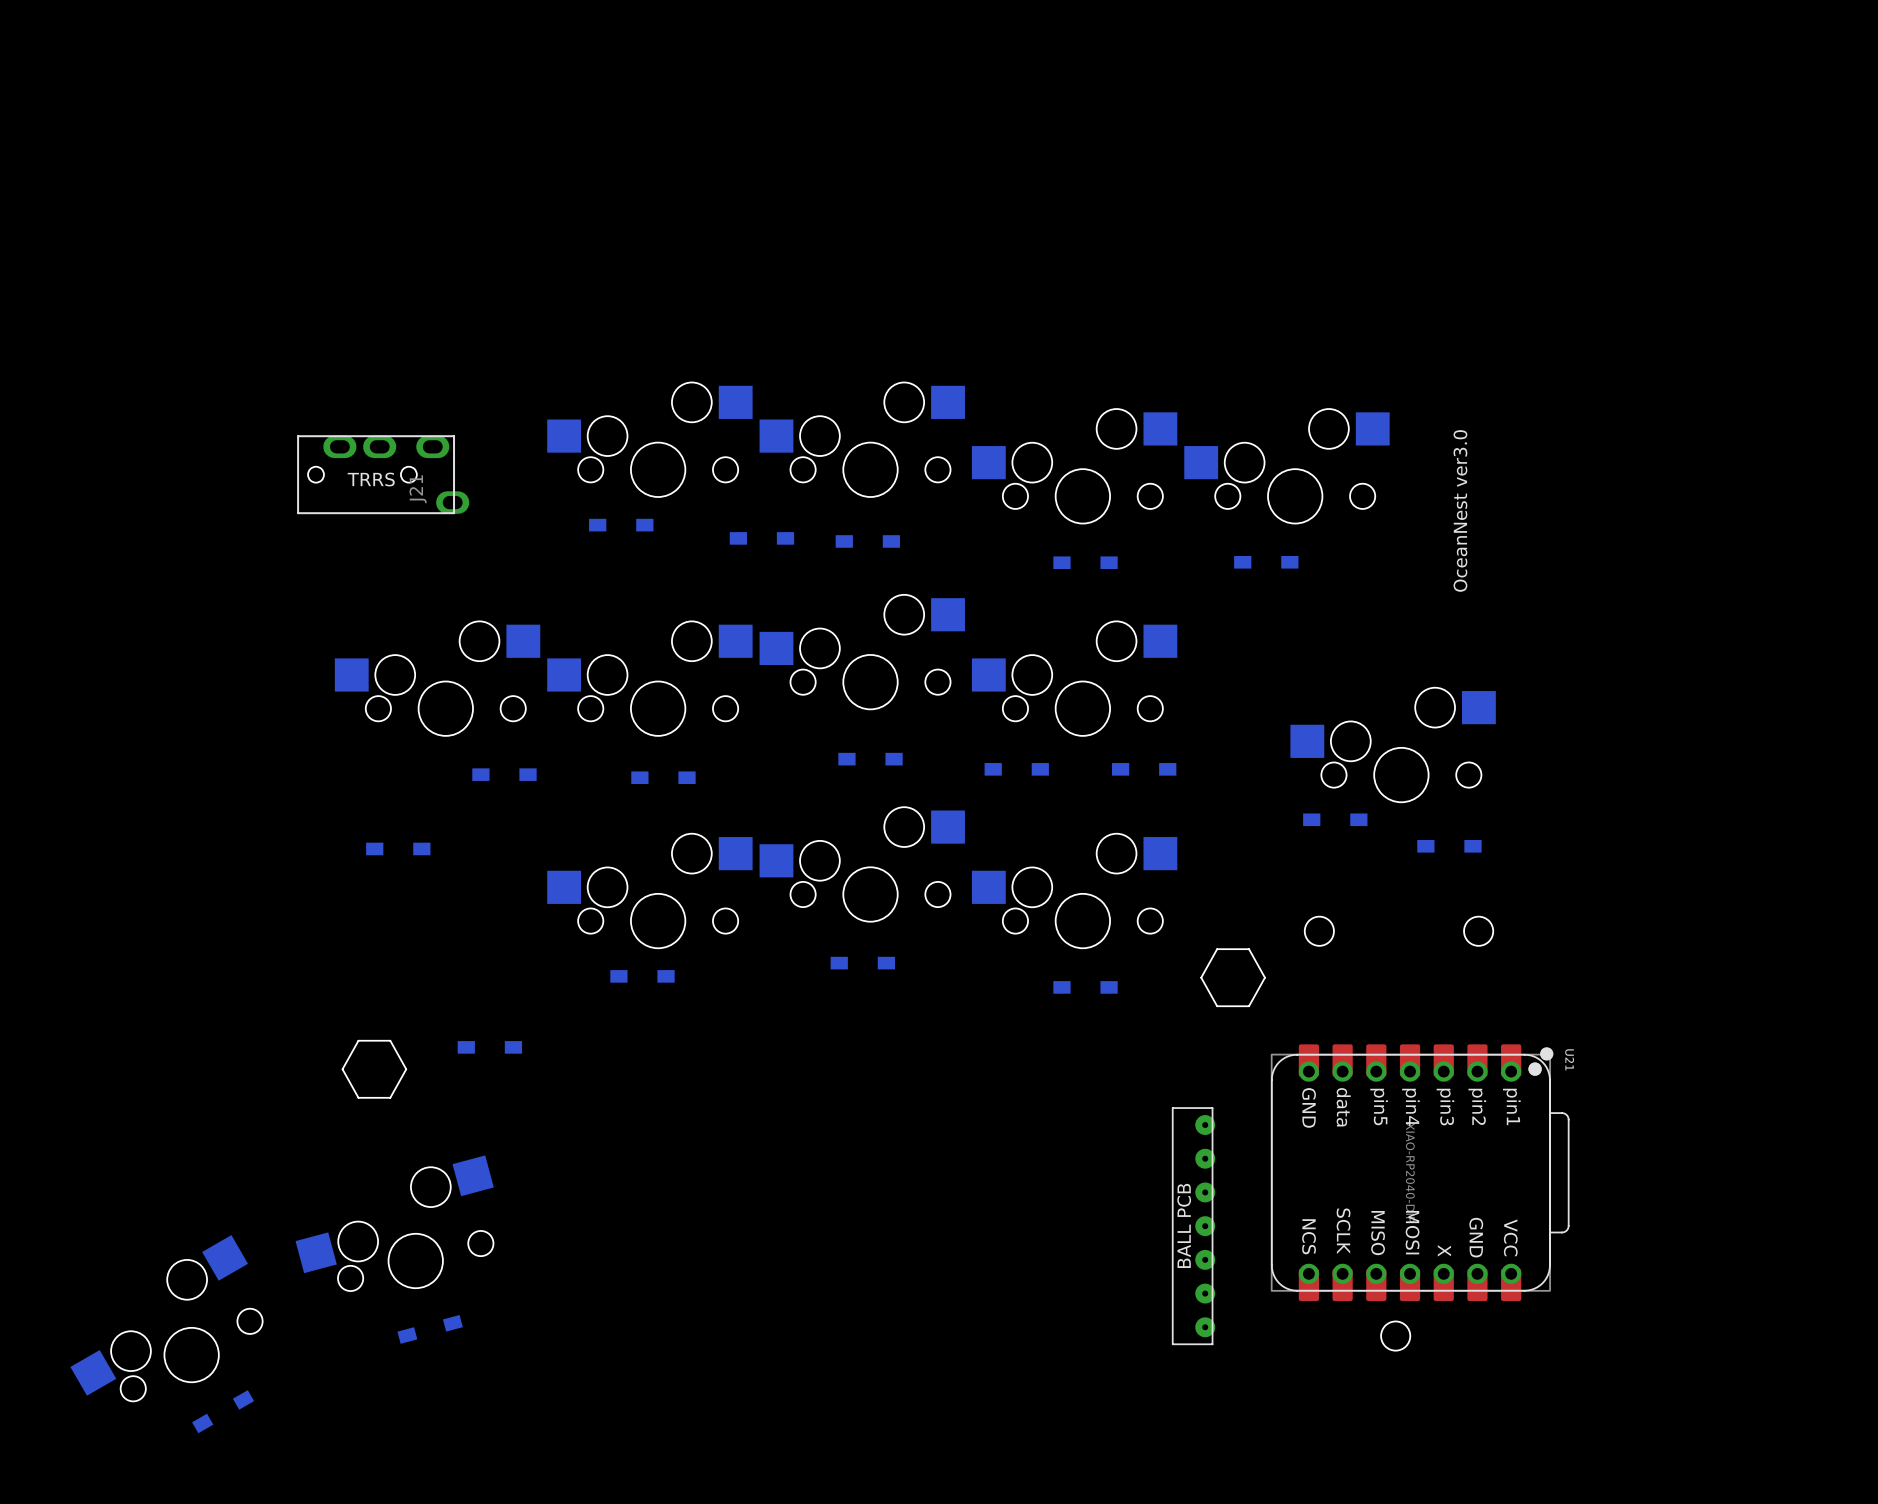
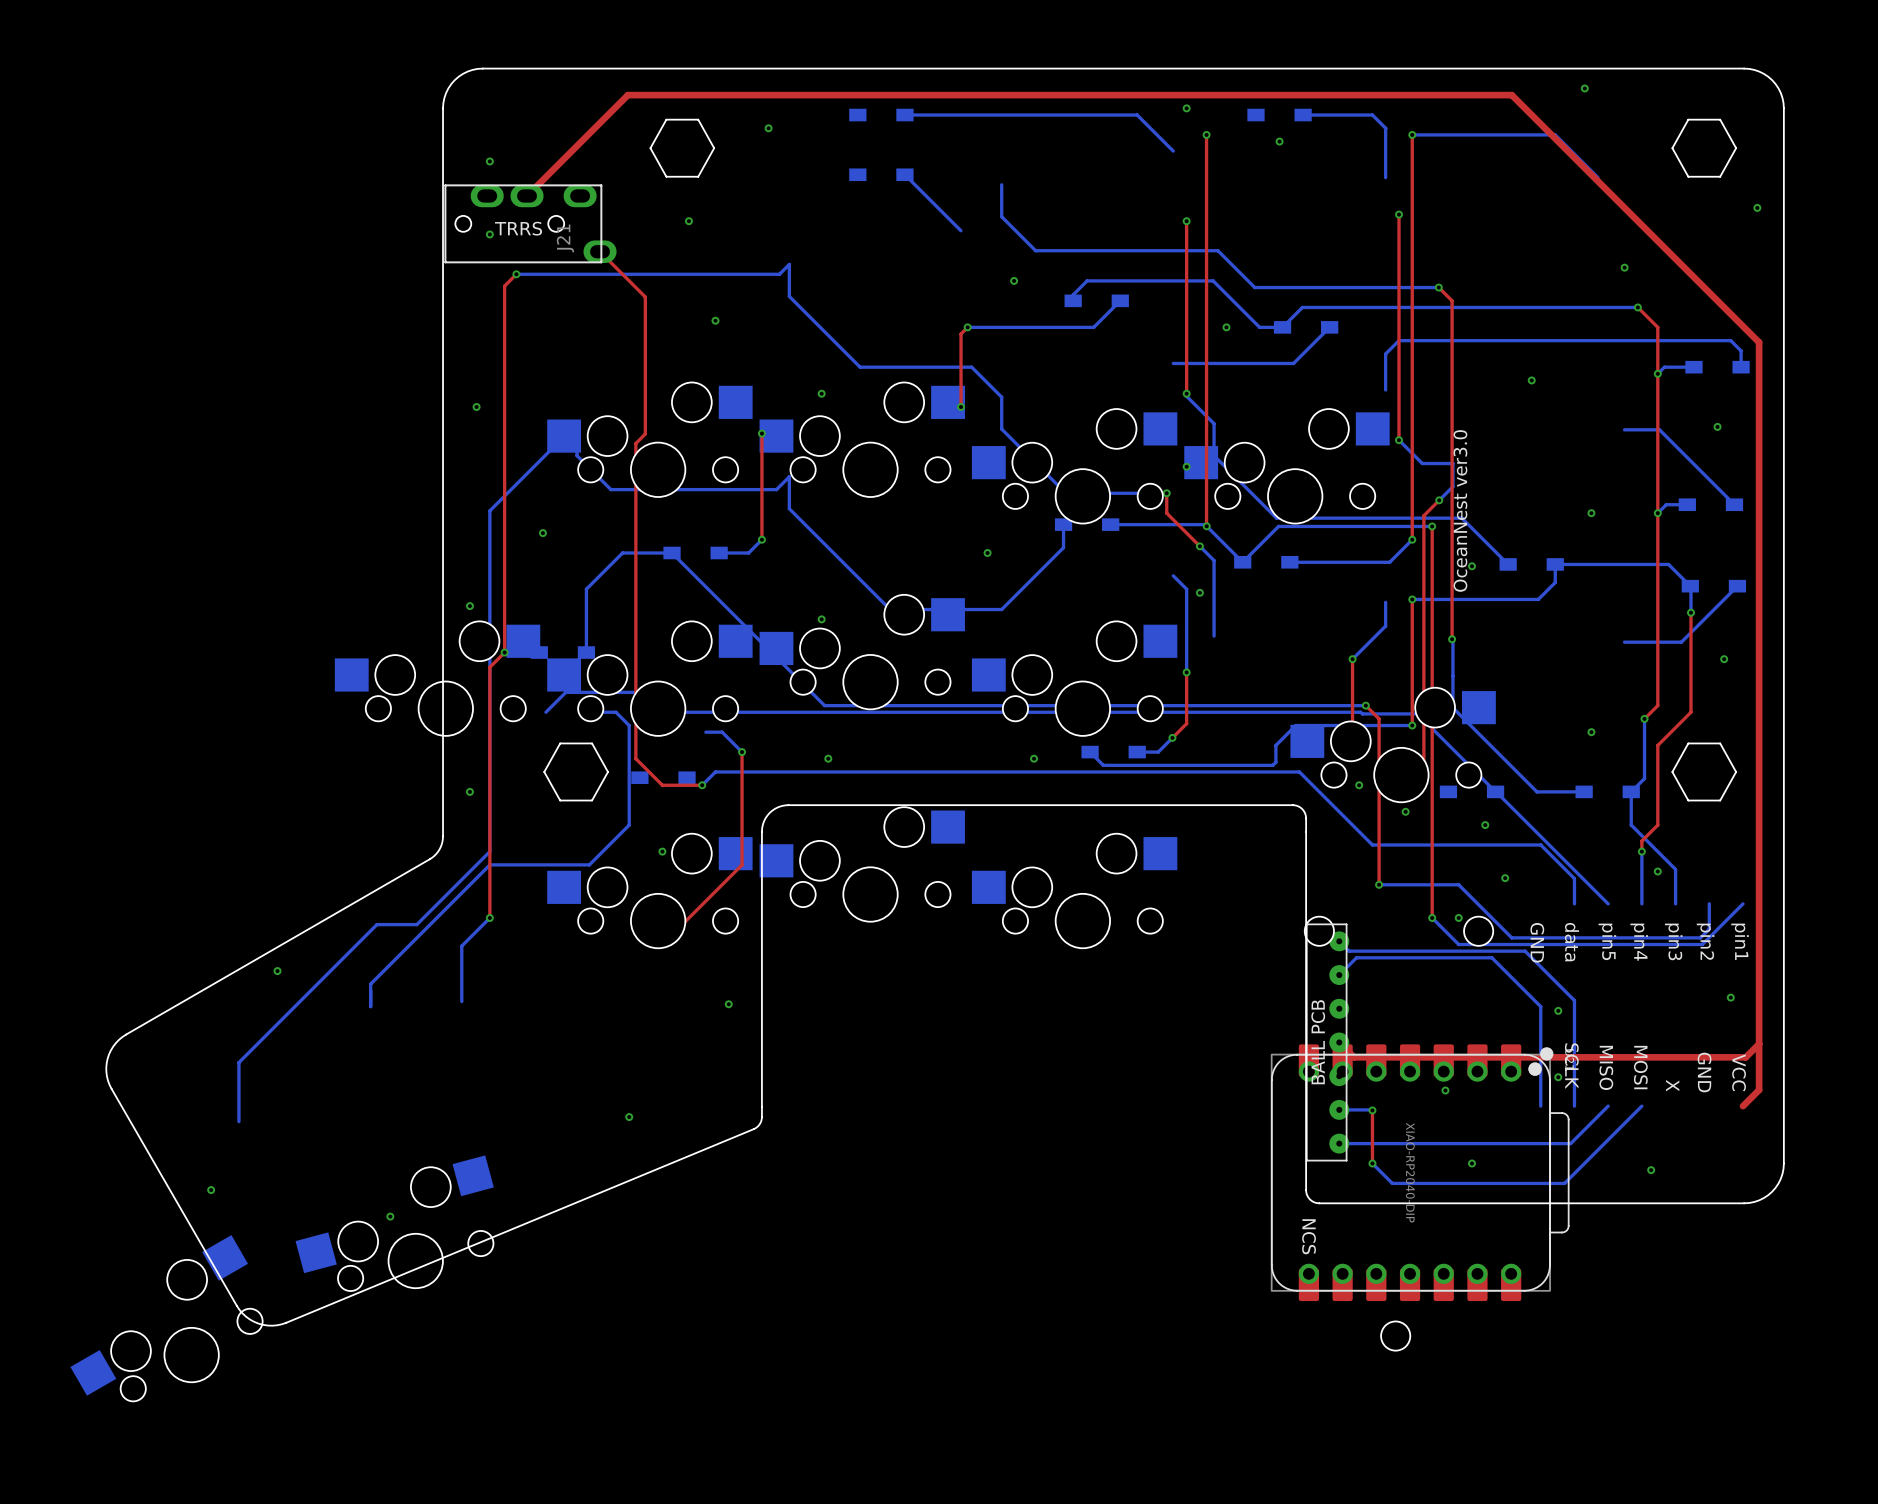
board edge: none -> (482, 68) (1744, 68) (1754, 69) (1768, 76) (1778, 88) (1783, 108) (1783, 1163) (1782, 1173) (1775, 1187) (1763, 1197) (1744, 1203) (1319, 1203) (1311, 1200) (1306, 1190) (1306, 818) (1304, 811) (1297, 805) (785, 805) (769, 812) (762, 828) (761, 1116) (757, 1126) (286, 1322) (277, 1325) (263, 1324) (246, 1316) (236, 1305) (111, 1088) (106, 1076) (106, 1063) (113, 1046) (126, 1034) (429, 859) (436, 854) (441, 844) (443, 108) (446, 93) (454, 80) (467, 71) (482, 68)
via: none -> (1584, 88)
via: none -> (1186, 108)
part: none -> (881, 115)
bottom track: none -> (904, 115) (1137, 115) (1173, 151)
part: none -> (1279, 115)
bottom track: none -> (1303, 115) (1372, 115) (1385, 128)
drawing: none -> [649, 119, 715, 178]
drawing: none -> [1671, 119, 1737, 178]
via: none -> (768, 128)
bottom track: none -> (1385, 128) (1385, 177)
top track: none -> (1206, 134) (1206, 526)
via: none -> (1206, 134)
top track: none -> (1412, 134) (1412, 539)
bottom track: none -> (1412, 134) (1555, 134) (1597, 177)
via: none -> (1412, 134)
via: none -> (1279, 141)
via: none -> (489, 161)
part: none -> (881, 174)
bottom track: none -> (904, 174) (960, 230)
bottom track: none -> (1001, 184) (1001, 216) (1035, 250) (1217, 250) (1254, 287) (1438, 287)
top track: none -> (527, 195) (627, 95) (1511, 95) (1759, 342) (1759, 1090) (1743, 1106)
via: none -> (1757, 207)
top track: none -> (1399, 214) (1399, 440)
via: none -> (1399, 214)
via: none -> (688, 221)
top track: none -> (1186, 221) (1186, 393)
via: none -> (1186, 221)
via: none -> (489, 234)
top track: none -> (600, 251) (645, 297) (645, 434) (635, 443) (635, 758) (662, 785) (702, 785)
via: none -> (1624, 267)
top track: none -> (516, 274) (504, 286) (504, 652) (489, 667) (489, 917)
bottom track: none -> (516, 274) (779, 274) (789, 264) (789, 296) (860, 367) (971, 367) (1001, 397) (1001, 429) (1065, 493) (1166, 493)
via: none -> (516, 274)
via: none -> (1014, 280)
top track: none -> (1438, 287) (1452, 300) (1452, 639)
via: none -> (1438, 287)
bottom track: none -> (1073, 300) (1073, 294) (1087, 280) (1213, 280) (1259, 327) (1282, 327) (1302, 307) (1637, 307)
part: none -> (1096, 300)
bottom track: none -> (1120, 300) (1093, 327) (967, 327)
top track: none -> (1637, 307) (1657, 327) (1657, 705) (1644, 718)
via: none -> (1637, 307)
via: none -> (715, 320)
top track: none -> (967, 327) (961, 334) (961, 407)
via: none -> (967, 327)
via: none -> (1226, 327)
part: none -> (1306, 327)
bottom track: none -> (1329, 327) (1293, 363) (1173, 363)
bottom track: none -> (1693, 367) (1664, 367) (1657, 373)
part: none -> (1717, 367)
bottom track: none -> (1741, 367) (1741, 350) (1730, 340) (1399, 340) (1385, 354) (1385, 390)
via: none -> (1657, 373)
via: none -> (1531, 380)
via: none -> (821, 393)
bottom track: none -> (1186, 393) (1186, 396) (1214, 423) (1214, 455) (1276, 518) (1461, 518) (1508, 564)
via: none -> (1186, 393)
via: none -> (476, 407)
via: none -> (961, 407)
via: none -> (1717, 426)
bottom track: none -> (1624, 429) (1659, 429) (1734, 504)
top track: none -> (761, 433) (761, 539)
via: none -> (761, 433)
bottom track: none -> (1399, 440) (1422, 463) (1452, 463) (1452, 486) (1439, 500)
via: none -> (1399, 440)
via: none -> (1186, 466)
J21 position: (383, 474) -> (530, 223)
top track: none -> (1166, 493) (1166, 513) (1199, 546)
via: none -> (1166, 493)
top track: none -> (1439, 500) (1423, 515) (1423, 771)
via: none -> (1439, 500)
bottom track: none -> (1687, 504) (1666, 504) (1657, 513)
part: none -> (1710, 504)
via: none -> (1591, 513)
via: none -> (1657, 513)
bottom track: none -> (1063, 524) (1063, 547) (1001, 609) (890, 609) (789, 508) (789, 476) (776, 489) (610, 489) (577, 455) (577, 423) (489, 510) (489, 851) (416, 924) (376, 924) (238, 1062) (238, 1121)
bottom track: none -> (1110, 524) (1205, 524) (1242, 562) (1278, 526) (1432, 526)
part: (621, 525) -> none
via: none -> (1206, 526)
top track: none -> (1432, 526) (1432, 917)
via: none -> (1432, 526)
via: none -> (542, 533)
part: (761, 538) -> none
bottom track: none -> (761, 539) (748, 553) (719, 553)
via: none -> (761, 539)
bottom track: none -> (1412, 539) (1389, 562) (1289, 562)
via: none -> (1412, 539)
part: (867, 541) -> none
bottom track: none -> (1199, 546) (1214, 560) (1214, 636)
via: none -> (1199, 546)
part: none -> (695, 553)
via: none -> (987, 553)
part position: (1085, 562) -> (1087, 524)
part: none -> (1531, 564)
via: none -> (1472, 566)
bottom track: none -> (1173, 575) (1186, 589) (1186, 672)
part: none -> (1713, 586)
bottom track: none -> (1737, 586) (1681, 642) (1624, 642)
via: none -> (1199, 592)
top track: none -> (1412, 599) (1412, 725)
bottom track: none -> (1412, 599) (1538, 599) (1555, 582) (1555, 564) (1668, 564) (1690, 586) (1690, 612)
via: none -> (1412, 599)
bottom track: none -> (1385, 602) (1385, 626) (1352, 659)
via: none -> (469, 606)
top track: none -> (1690, 612) (1690, 712) (1657, 745) (1657, 825) (1641, 841) (1641, 851)
via: none -> (1690, 612)
via: none -> (821, 619)
bottom track: none -> (1452, 639) (1452, 707) (1536, 791) (1584, 791)
via: none -> (1452, 639)
via: none -> (504, 652)
part: none -> (562, 652)
bottom track: none -> (586, 652) (586, 589) (622, 553) (672, 553) (824, 705) (1365, 705)
top track: none -> (1352, 659) (1352, 738)
via: none -> (1352, 659)
via: none -> (1724, 659)
top track: none -> (1186, 672) (1186, 723) (1172, 737)
via: none -> (1186, 672)
top track: none -> (1365, 705) (1379, 718) (1379, 884)
via: none -> (1365, 705)
bottom track: none -> (545, 712) (565, 692) (649, 692) (658, 701) (658, 732) (678, 712) (1360, 712) (1362, 713) (1417, 713) (1608, 903)
bottom track: none -> (593, 712) (615, 712) (629, 725) (629, 825) (589, 864) (489, 864) (370, 984) (370, 1006)
bottom track: none -> (1644, 718) (1644, 778) (1631, 791) (1631, 825) (1675, 869) (1675, 903)
via: none -> (1644, 718)
bottom track: none -> (1412, 725) (1295, 725) (1275, 745) (1275, 762) (1272, 765) (1103, 765) (1090, 752)
via: none -> (1412, 725)
bottom track: none -> (705, 732) (722, 732) (742, 752)
via: none -> (1591, 732)
bottom track: none -> (1172, 737) (1158, 752) (1137, 752)
via: none -> (1172, 737)
drawing: none -> [543, 742, 609, 802]
drawing: none -> [1671, 742, 1737, 802]
top track: none -> (742, 752) (742, 864) (682, 924)
via: none -> (742, 752)
via: none -> (828, 758)
via: none -> (1034, 758)
part: (870, 759) -> none
part: (1016, 769) -> none
part position: (1144, 769) -> (1113, 752)
part: (504, 774) -> none
bottom track: none -> (702, 785) (715, 771) (1299, 771) (1372, 844) (1540, 844) (1574, 878) (1574, 903)
via: none -> (702, 785)
via: none -> (1359, 785)
via: none -> (469, 791)
part: none -> (1607, 791)
via: none -> (1405, 811)
part: (1335, 819) -> none
via: none -> (1485, 825)
part position: (1449, 846) -> (1472, 791)
part: (398, 848) -> none
via: none -> (662, 851)
bottom track: none -> (1641, 851) (1641, 903)
via: none -> (1641, 851)
via: none -> (1657, 871)
via: none -> (1505, 878)
bottom track: none -> (1379, 884) (1458, 884) (1511, 937) (1700, 937) (1709, 929) (1709, 903)
via: none -> (1379, 884)
bottom track: none -> (1743, 903) (1702, 944) (1458, 944) (1432, 917)
bottom track: none -> (489, 917) (461, 946) (461, 1001)
via: none -> (489, 917)
via: none -> (1432, 917)
via: none -> (1458, 917)
bottom track: none -> (1339, 941) (1349, 951) (1525, 951) (1574, 1000) (1574, 1106)
text: none -> GND (1537, 942)
drawing: [1200, 948, 1266, 1007] -> none
part: (862, 963) -> none
via: none -> (277, 971)
bottom track: none -> (1339, 975) (1356, 957) (1491, 957) (1540, 1006) (1540, 1106)
part: (642, 976) -> none
part: (1085, 987) -> none
via: none -> (1730, 997)
via: none -> (728, 1004)
via: none -> (1558, 1010)
drawing: [341, 1040, 407, 1099] -> none
top track: none -> (1339, 1042) (1354, 1057) (1745, 1057) (1759, 1044)
part: (489, 1047) -> none
text: none -> GND (1704, 1072)
via: none -> (1558, 1077)
via: none -> (1445, 1090)
text position: pin2 (1477, 1106) -> pin2 (1705, 941)
text position: pin1 (1511, 1106) -> pin1 (1740, 941)
bottom track: none -> (1608, 1106) (1570, 1143) (1339, 1143)
bottom track: none -> (1641, 1106) (1564, 1183) (1392, 1183) (1372, 1163)
text: GND (1309, 1107) -> none
text position: data (1343, 1107) -> data (1571, 942)
text position: pin5 (1379, 1107) -> pin5 (1607, 941)
text position: pin4 (1410, 1107) -> pin4 (1639, 942)
text position: pin3 (1445, 1107) -> pin3 (1673, 941)
bottom track: none -> (1339, 1109) (1372, 1110)
top track: none -> (1372, 1110) (1372, 1163)
via: none -> (1372, 1110)
via: none -> (629, 1117)
via: none -> (1372, 1163)
via: none -> (1472, 1163)
via: none -> (1651, 1170)
via: none -> (211, 1190)
via: none -> (390, 1216)
part position: (1193, 1226) -> (1327, 1042)
text position: SCLK (1343, 1231) -> SCLK (1571, 1066)
text position: MOSI (1412, 1232) -> MOSI (1640, 1067)
text position: MISO (1378, 1233) -> MISO (1606, 1067)
text: GND (1476, 1237) -> none
text position: VCC (1510, 1237) -> VCC (1739, 1072)
text position: X (1444, 1250) -> X (1672, 1085)
part: (430, 1329) -> none
part: (223, 1411) -> none

